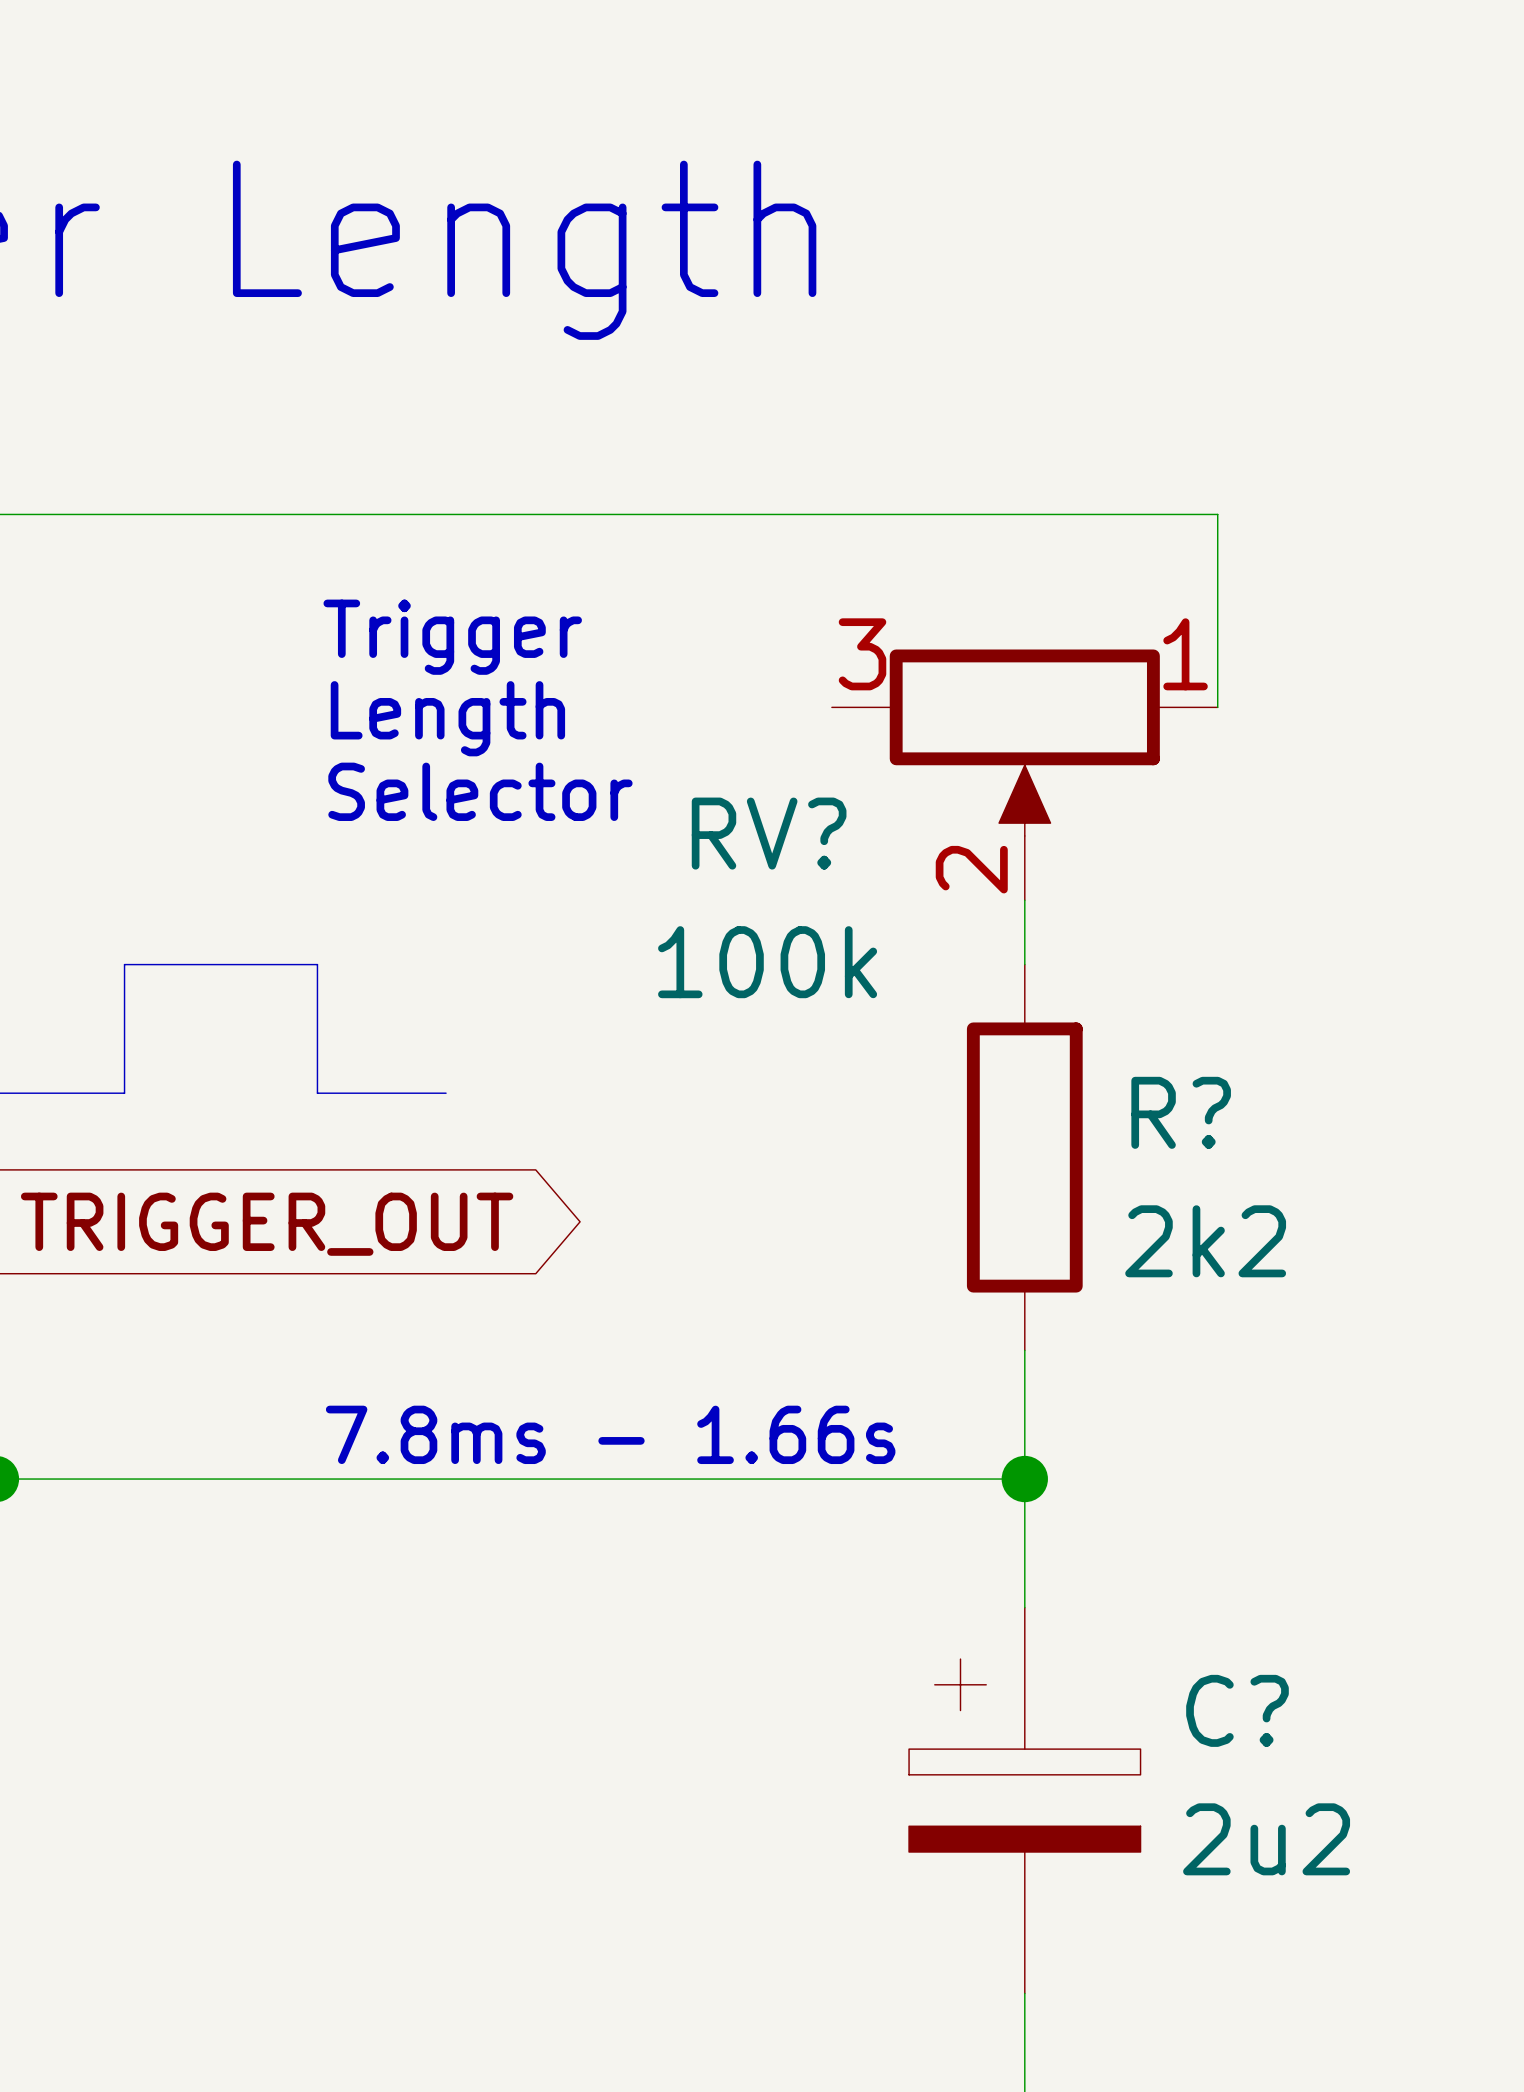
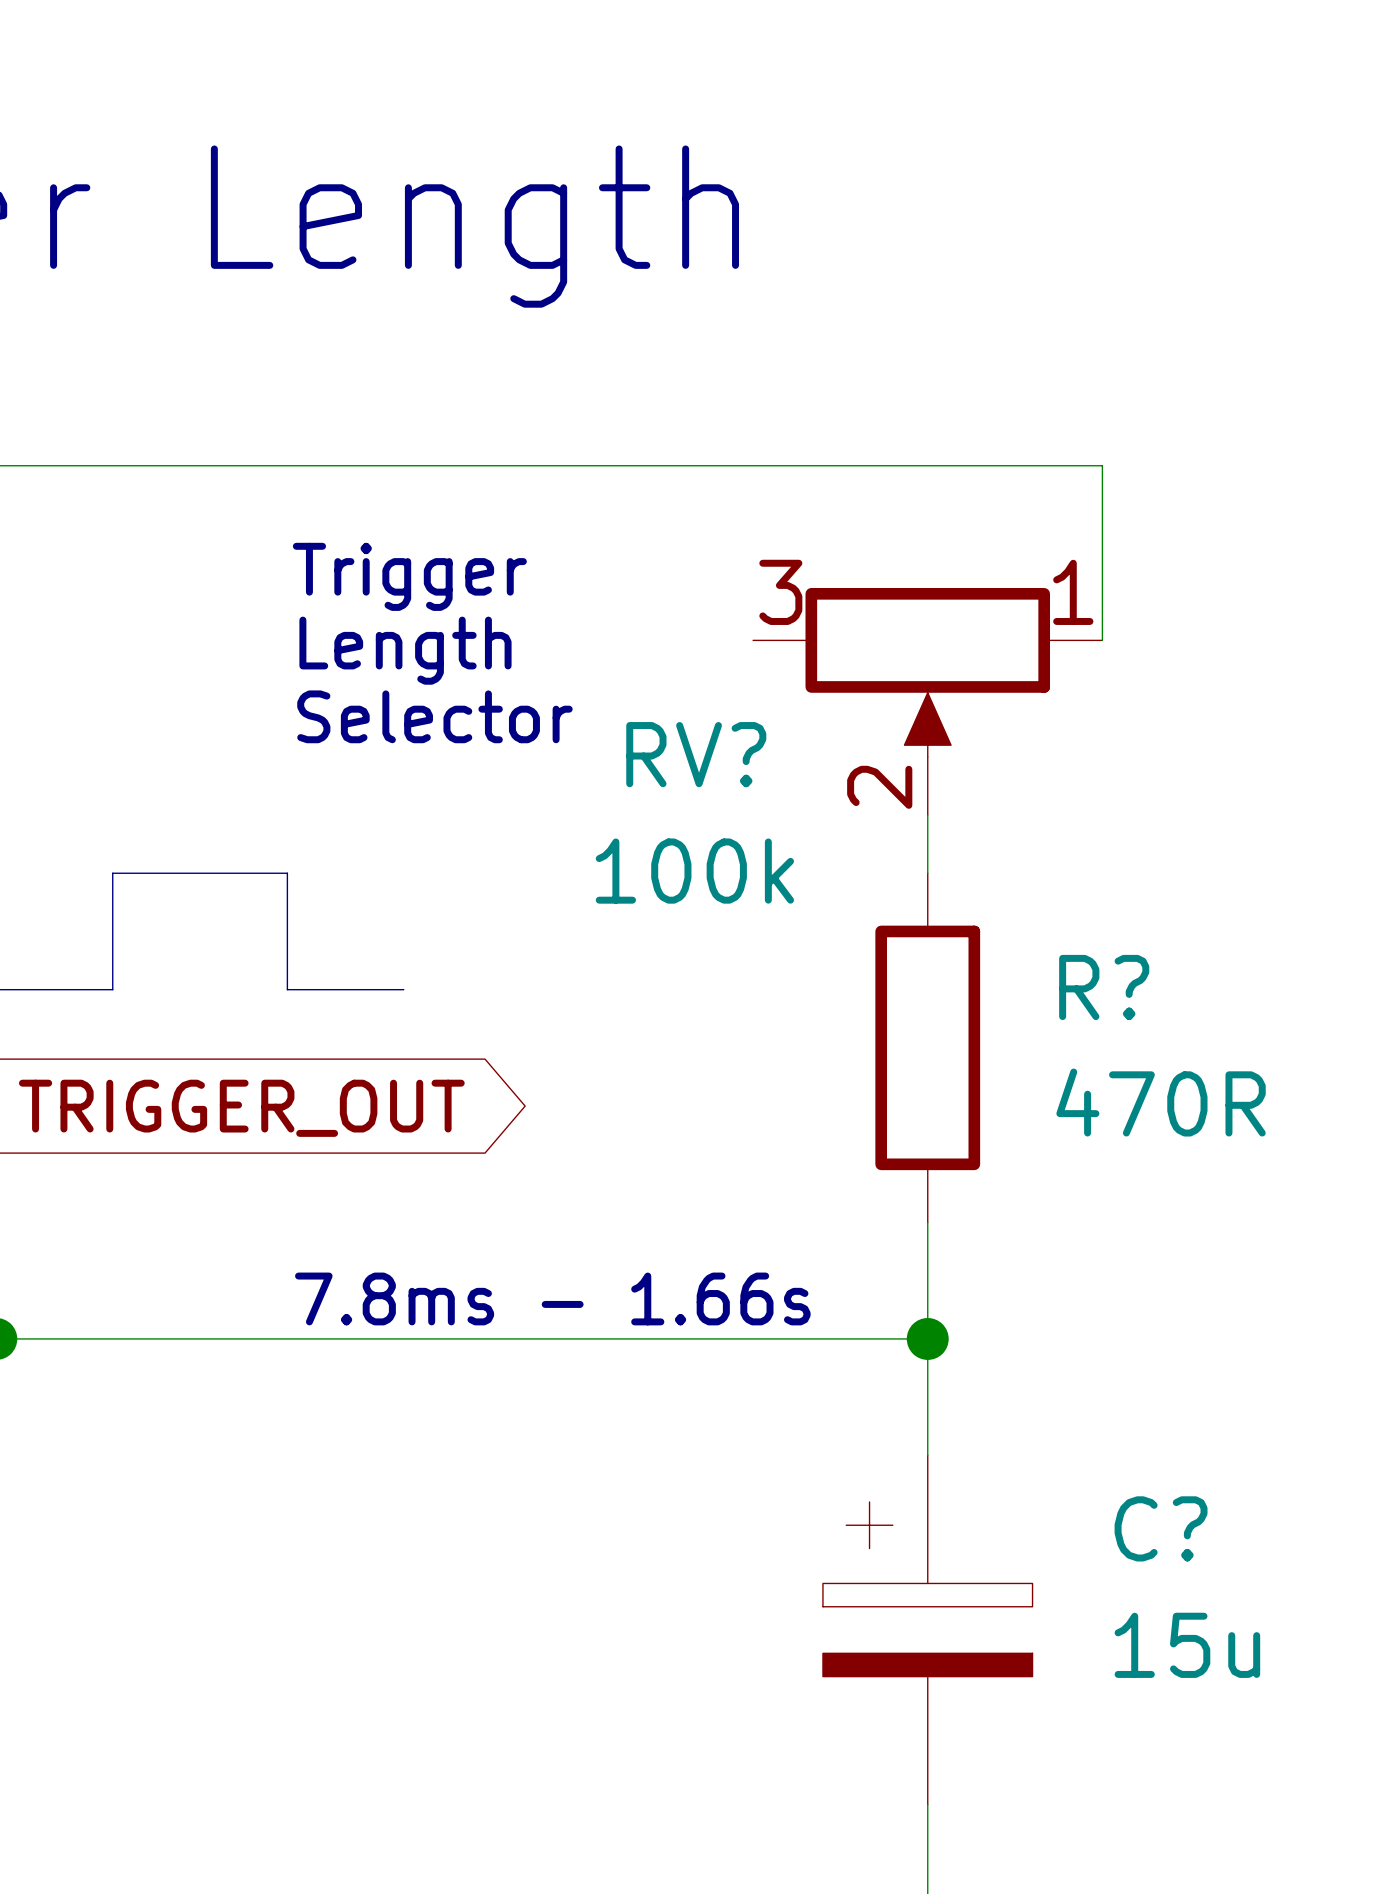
R? name position: R? (1181, 1112) -> R? (1104, 987)
R? value: 2k2 (1205, 1241) -> 470R (1161, 1102)
C? name position: C? (1237, 1710) -> C? (1161, 1528)
C? value: 2u2 (1266, 1839) -> 15u (1187, 1645)

